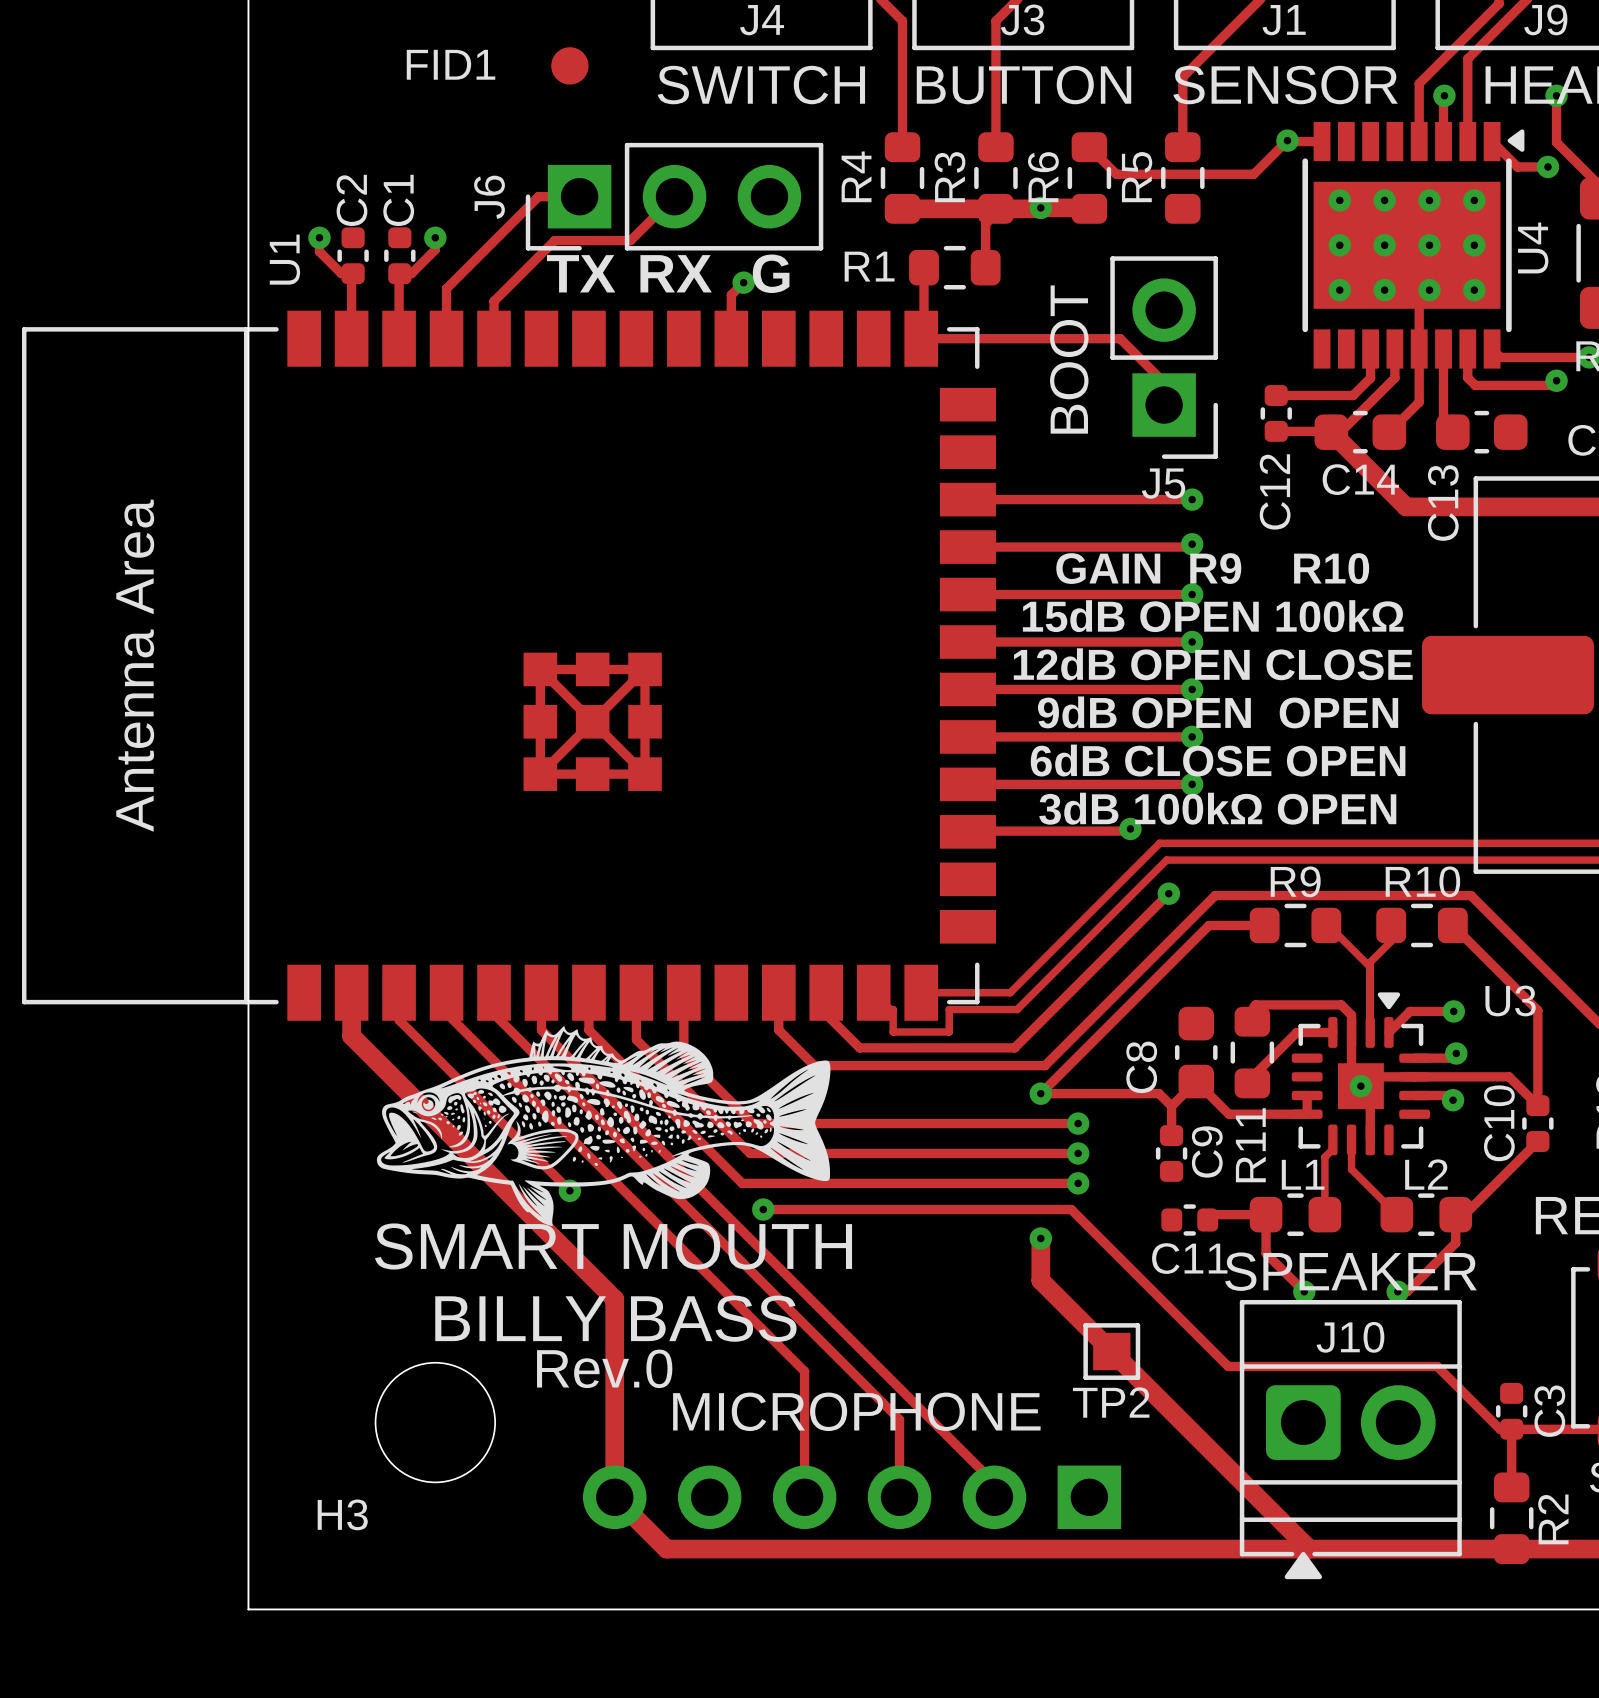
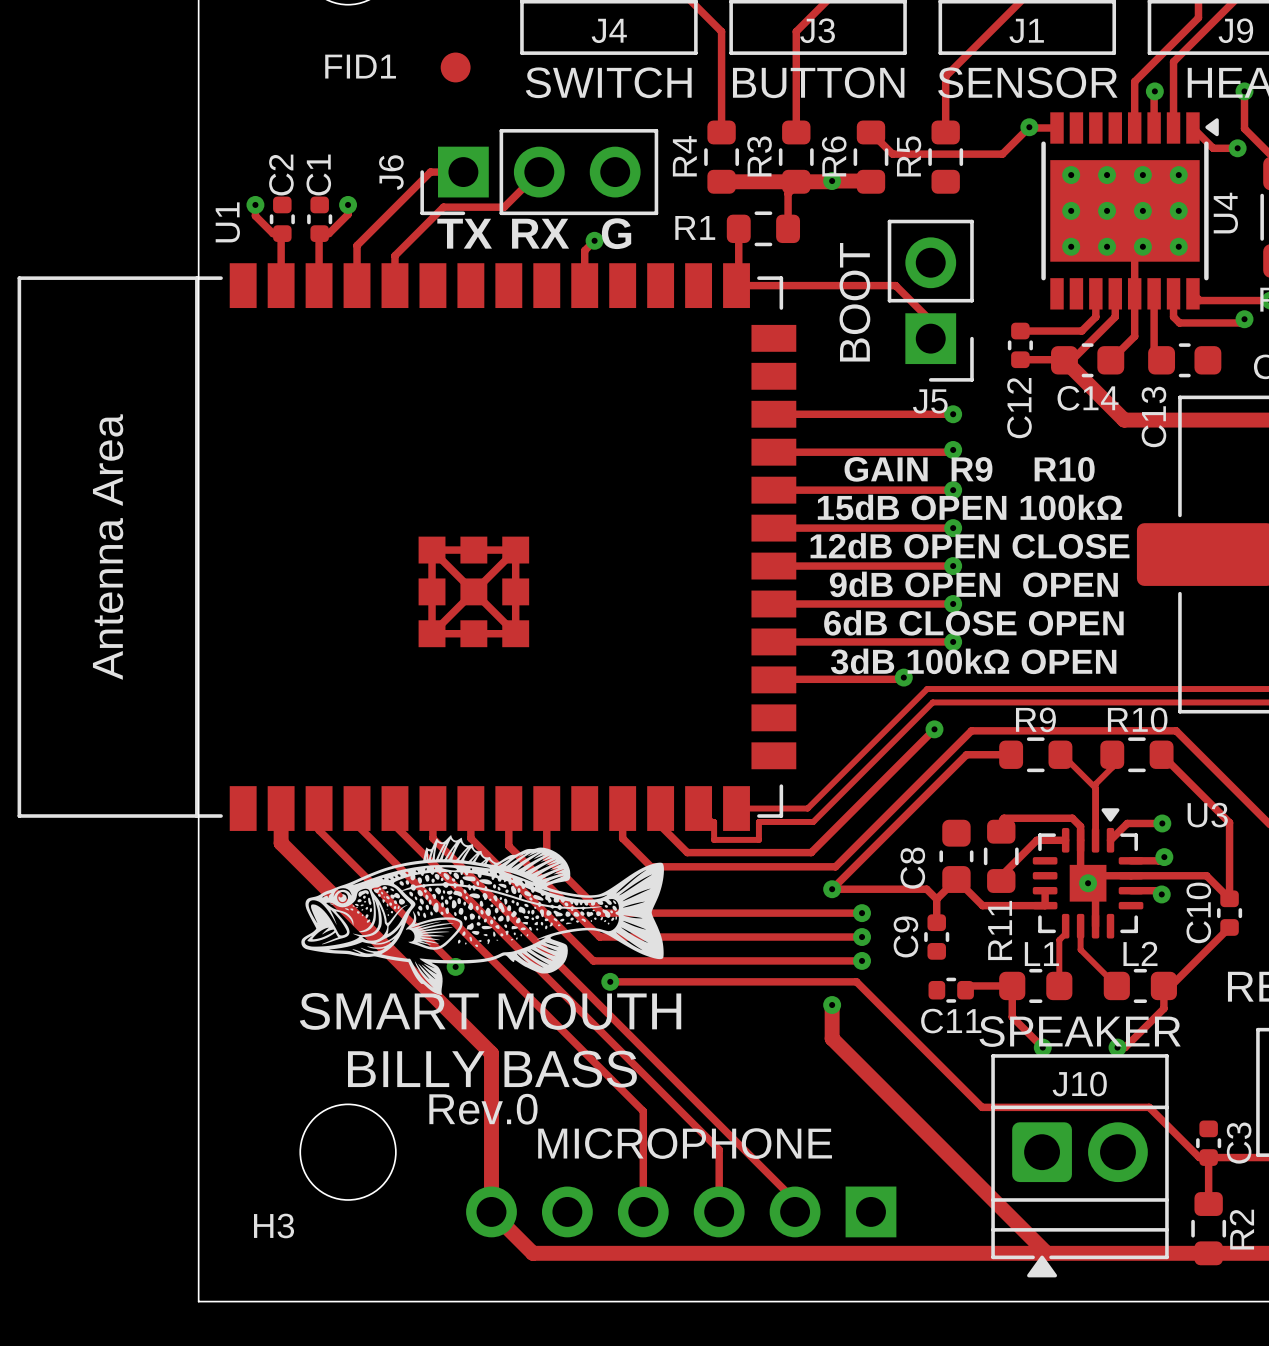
C9 name position: C9 (1207, 1151) -> C9 (905, 936)
TP2: (1111, 1351) -> none

